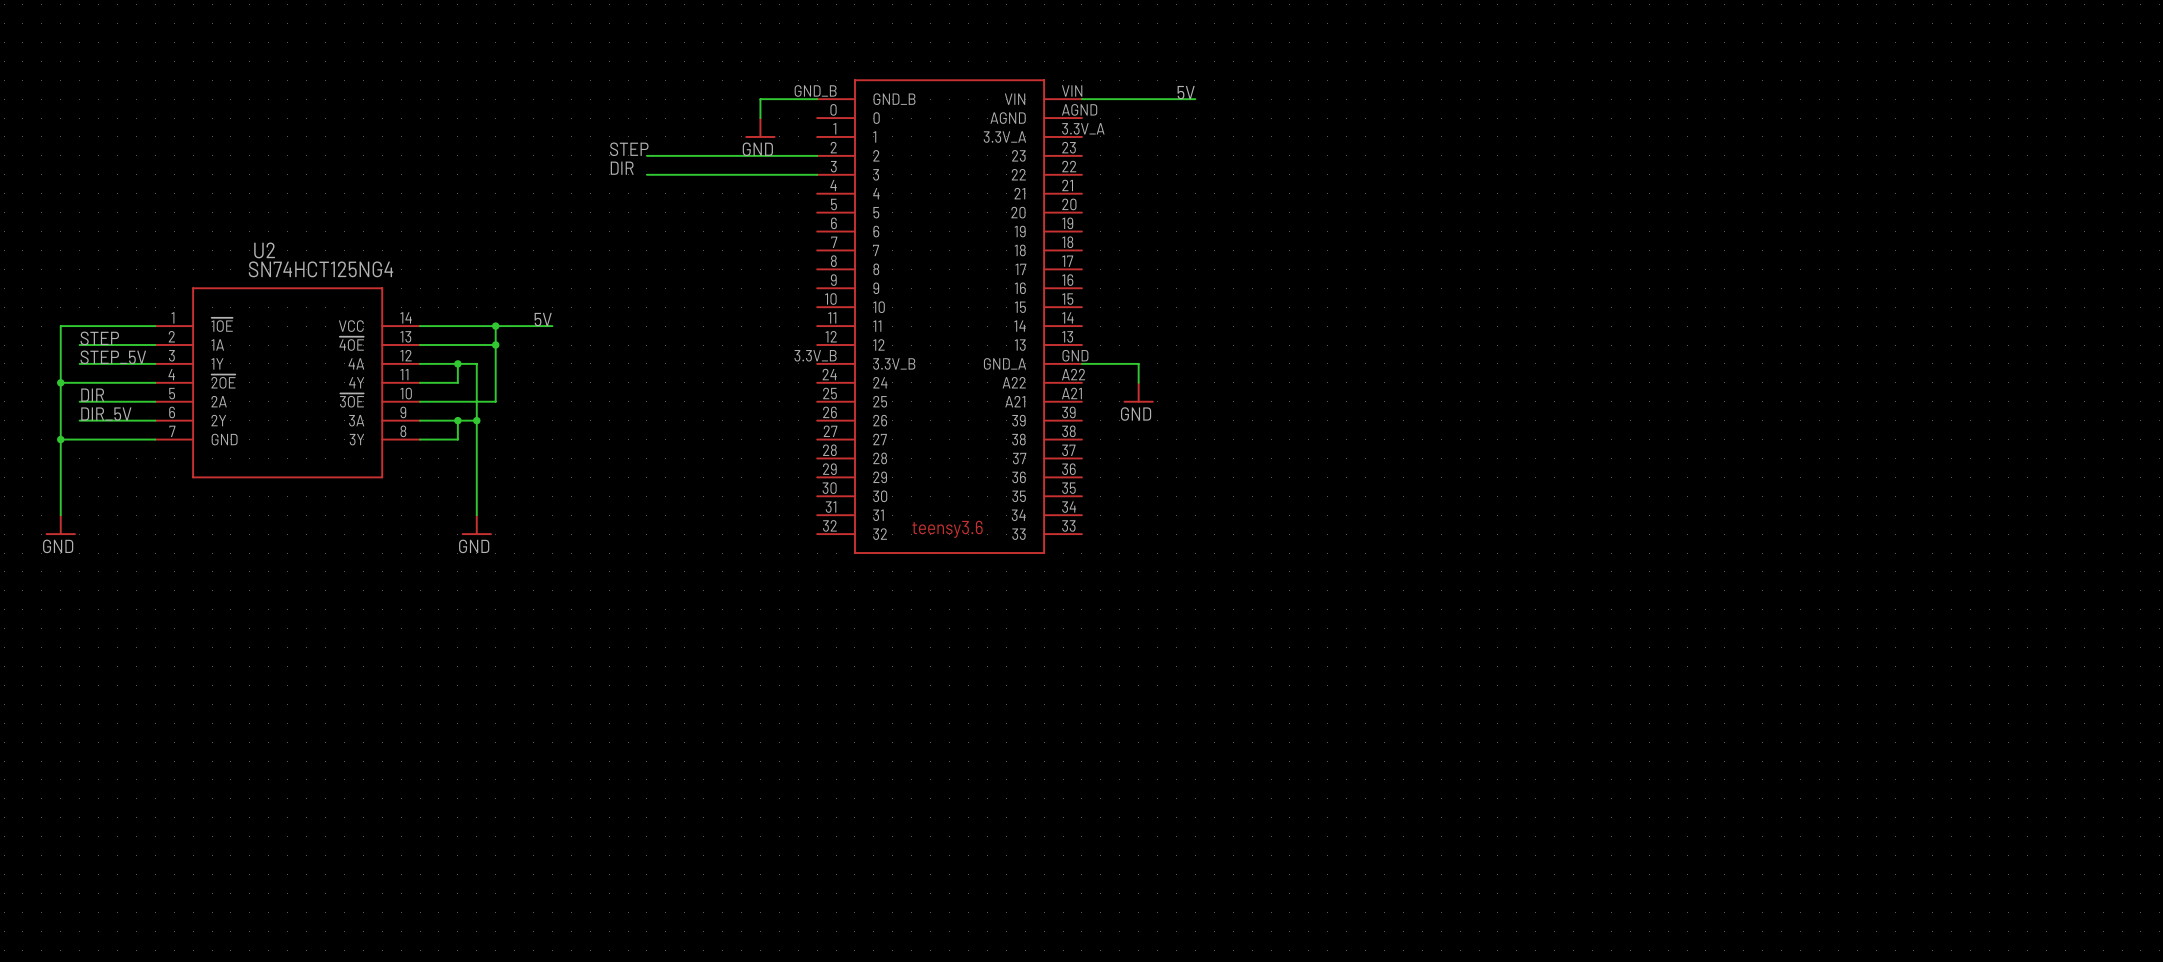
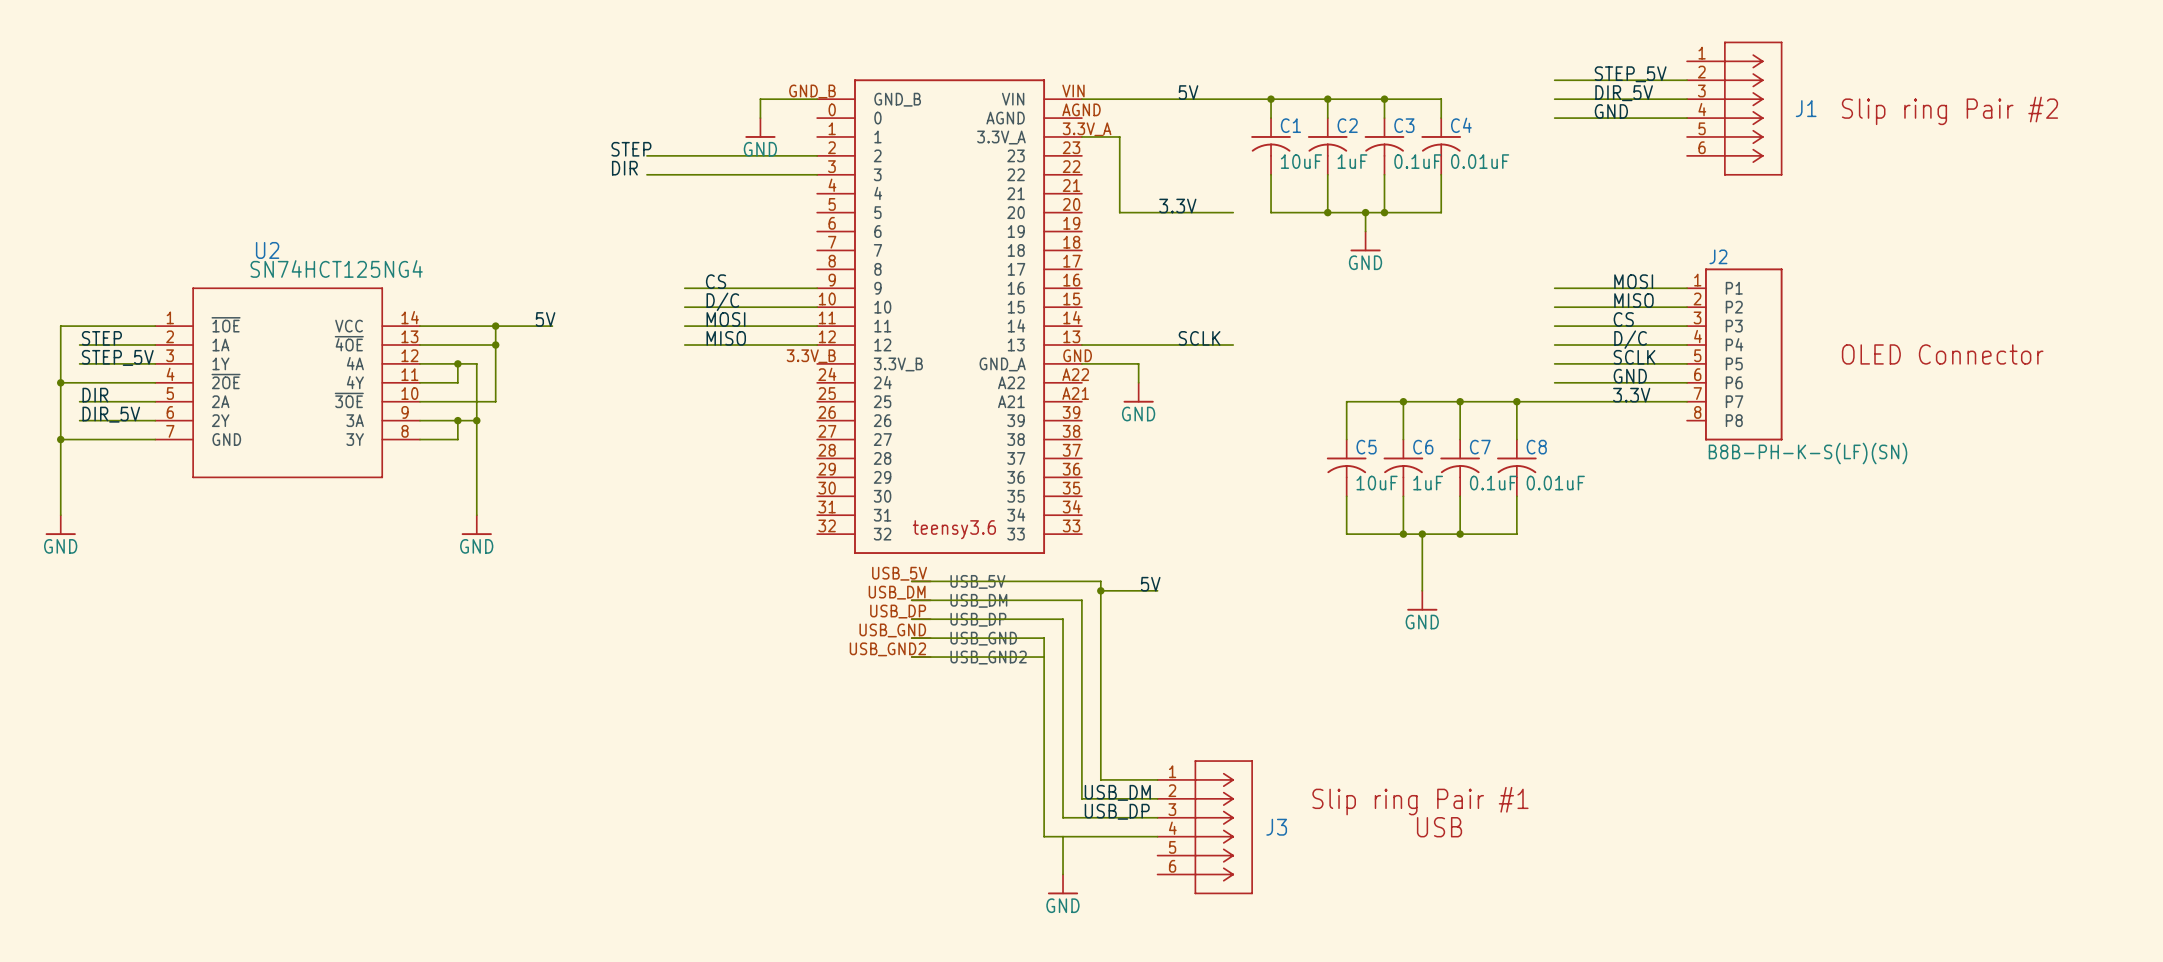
label: none -> STEP_5V (1630, 74)
wire: none -> (1554, 80) (1687, 80)
label: none -> DIR_5V (1624, 93)
wire: none -> (1195, 99) (1441, 99) (1441, 118)
wire: none -> (1271, 99) (1271, 118)
junction: none -> (1271, 99)
wire: none -> (1327, 99) (1327, 118)
junction: none -> (1327, 99)
wire: none -> (1384, 99) (1384, 118)
junction: none -> (1384, 99)
wire: none -> (1554, 99) (1687, 99)
J1: none -> (1734, 108)
label: none -> GND (1611, 111)
text: none -> Slip ring Pair #2 (1949, 110)
wire: none -> (1554, 118) (1687, 118)
wire: none -> (1081, 136) (1119, 136) (1119, 212) (1233, 212)
C1: none -> 10uF (1271, 146)
C2: none -> 1uF (1327, 146)
C3: none -> 0.1uF (1384, 146)
C4: none -> 0.01uF (1441, 146)
wire: none -> (1271, 174) (1271, 212) (1441, 212) (1441, 174)
wire: none -> (1327, 174) (1327, 212)
wire: none -> (1384, 174) (1384, 212)
label: none -> 3.3V (1177, 206)
junction: none -> (1327, 212)
wire: none -> (1365, 212) (1365, 231)
junction: none -> (1365, 212)
junction: none -> (1384, 212)
power symbol: none -> GND (1365, 241)
label: none -> CS (716, 281)
label: none -> MOSI (1633, 281)
wire: none -> (684, 288) (817, 288)
wire: none -> (1554, 288) (1687, 288)
label: none -> D/C (722, 301)
label: none -> MISO (1633, 300)
wire: none -> (684, 307) (817, 307)
wire: none -> (1554, 307) (1687, 307)
part: (949, 316) -> none
label: none -> MOSI (725, 319)
label: none -> CS (1623, 319)
wire: none -> (684, 326) (817, 326)
wire: none -> (1554, 326) (1687, 326)
label: none -> MISO (726, 338)
label: none -> SCLK (1199, 338)
label: none -> D/C (1630, 339)
wire: none -> (684, 345) (817, 345)
wire: none -> (1081, 345) (1233, 345)
wire: none -> (1554, 345) (1687, 345)
J2: none -> B8B-PH-K-S(LF)(SN) (1734, 354)
text: none -> OLED Connector (1942, 354)
label: none -> SCLK (1634, 357)
wire: none -> (1554, 363) (1687, 363)
part: none -> (949, 368)
label: none -> GND (1630, 376)
wire: none -> (1554, 382) (1687, 382)
label: none -> 3.3V (1631, 395)
wire: none -> (1403, 401) (1403, 439)
junction: none -> (1403, 401)
wire: none -> (1460, 401) (1460, 439)
junction: none -> (1460, 401)
wire: none -> (1516, 401) (1516, 439)
junction: none -> (1516, 401)
wire: none -> (1687, 401) (1346, 401) (1346, 439)
C5: none -> 10uF (1346, 467)
C6: none -> 1uF (1403, 467)
C7: none -> 0.1uF (1460, 467)
C8: none -> 0.01uF (1516, 467)
wire: none -> (1346, 496) (1346, 534) (1516, 534) (1516, 496)
wire: none -> (1403, 496) (1403, 534)
wire: none -> (1460, 496) (1460, 534)
junction: none -> (1403, 534)
wire: none -> (1422, 534) (1422, 590)
junction: none -> (1422, 534)
junction: none -> (1460, 534)
wire: none -> (911, 581) (1100, 581) (1100, 779) (1157, 779)
label: none -> 5V (1150, 584)
wire: none -> (1100, 590) (1157, 590)
junction: none -> (1100, 590)
wire: none -> (911, 600) (1081, 600) (1081, 798) (1157, 798)
power symbol: none -> GND (1422, 600)
wire: none -> (911, 619) (1063, 619) (1063, 817) (1157, 817)
wire: none -> (911, 638) (1044, 638) (1044, 836) (1157, 836)
wire: none -> (911, 657) (1044, 657)
label: none -> USB_DM (1117, 792)
text: none -> Slip ring Pair #1 (1420, 801)
label: none -> USB_DP (1117, 811)
J3: none -> (1205, 827)
text: none -> USB (1439, 827)
wire: none -> (1063, 836) (1063, 874)
power symbol: none -> GND (1063, 884)

